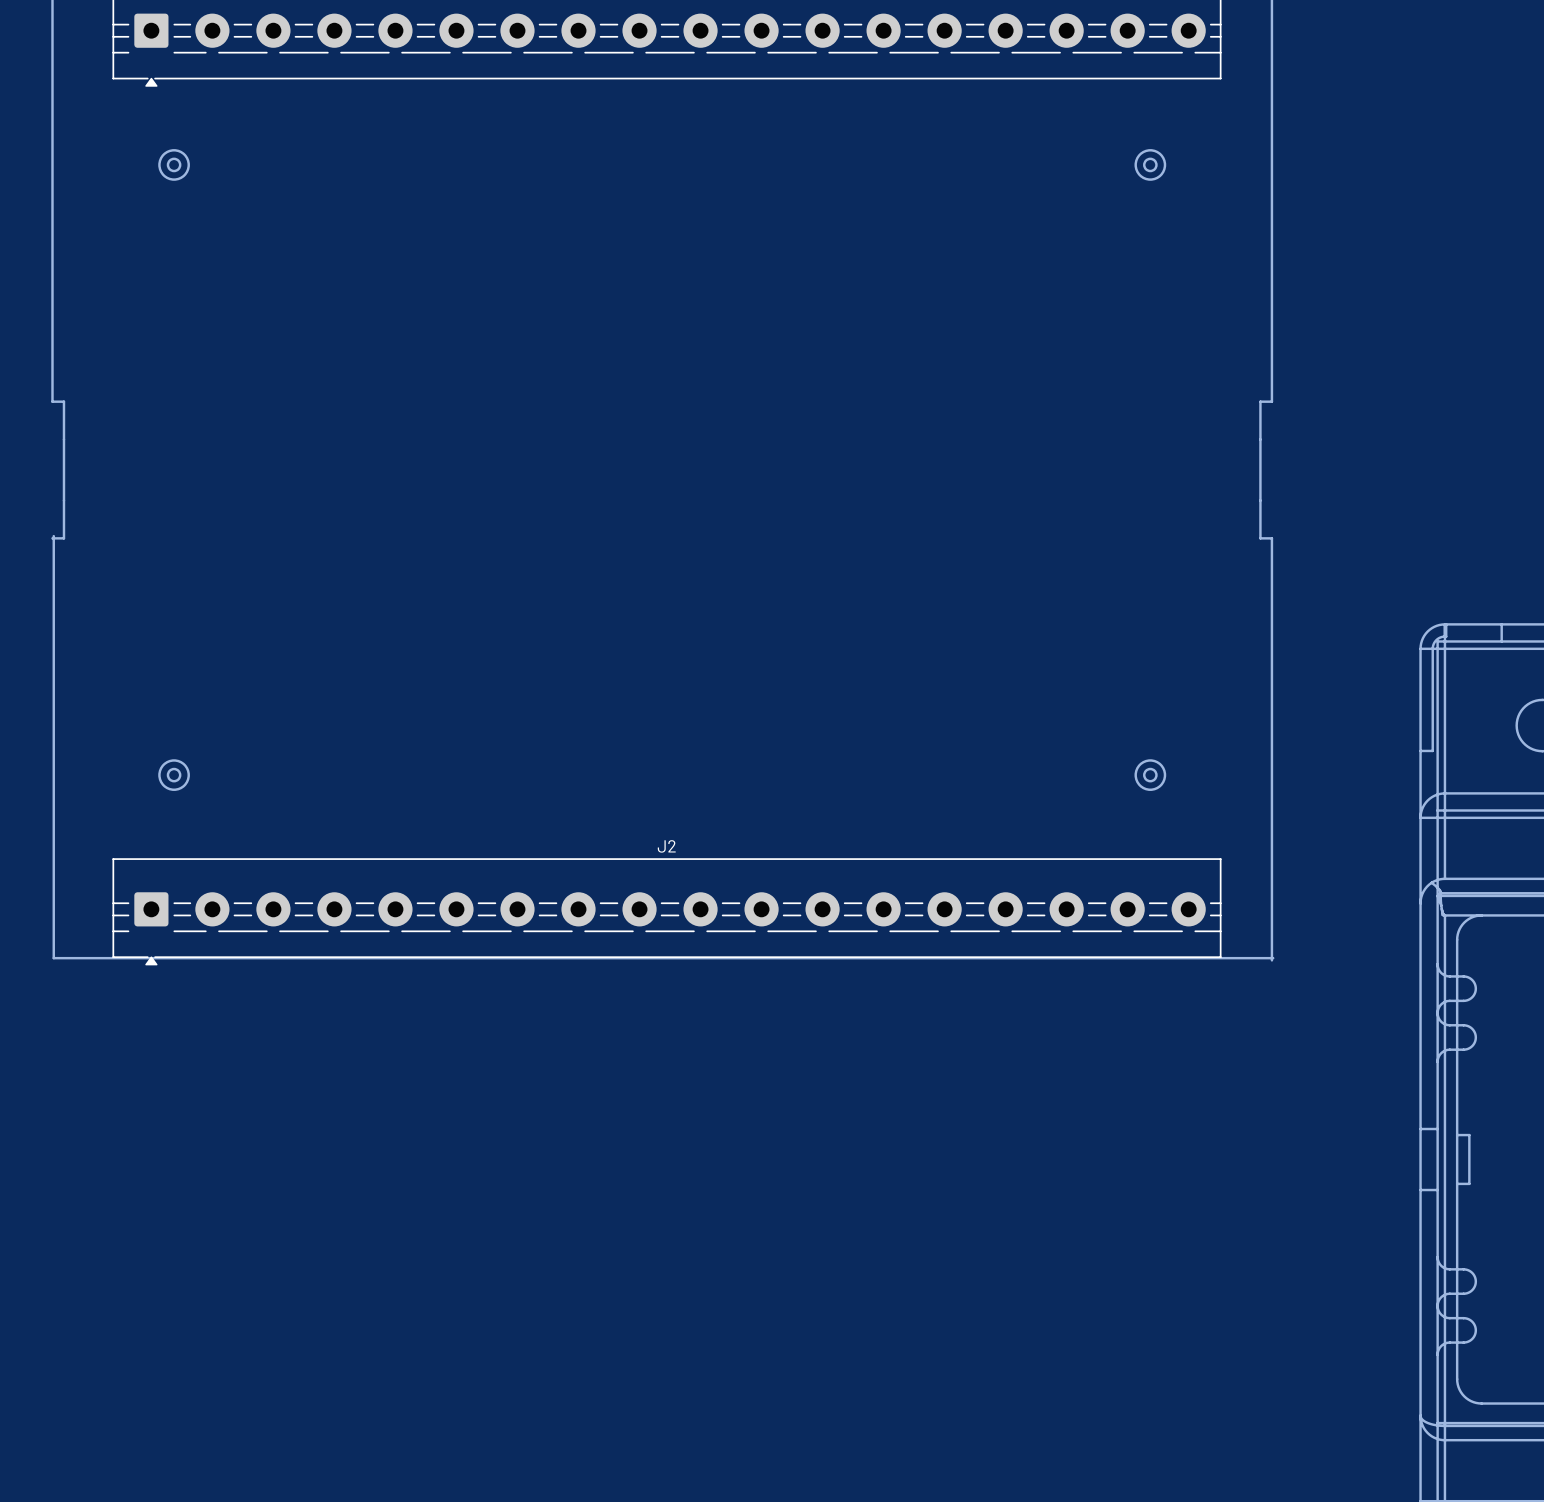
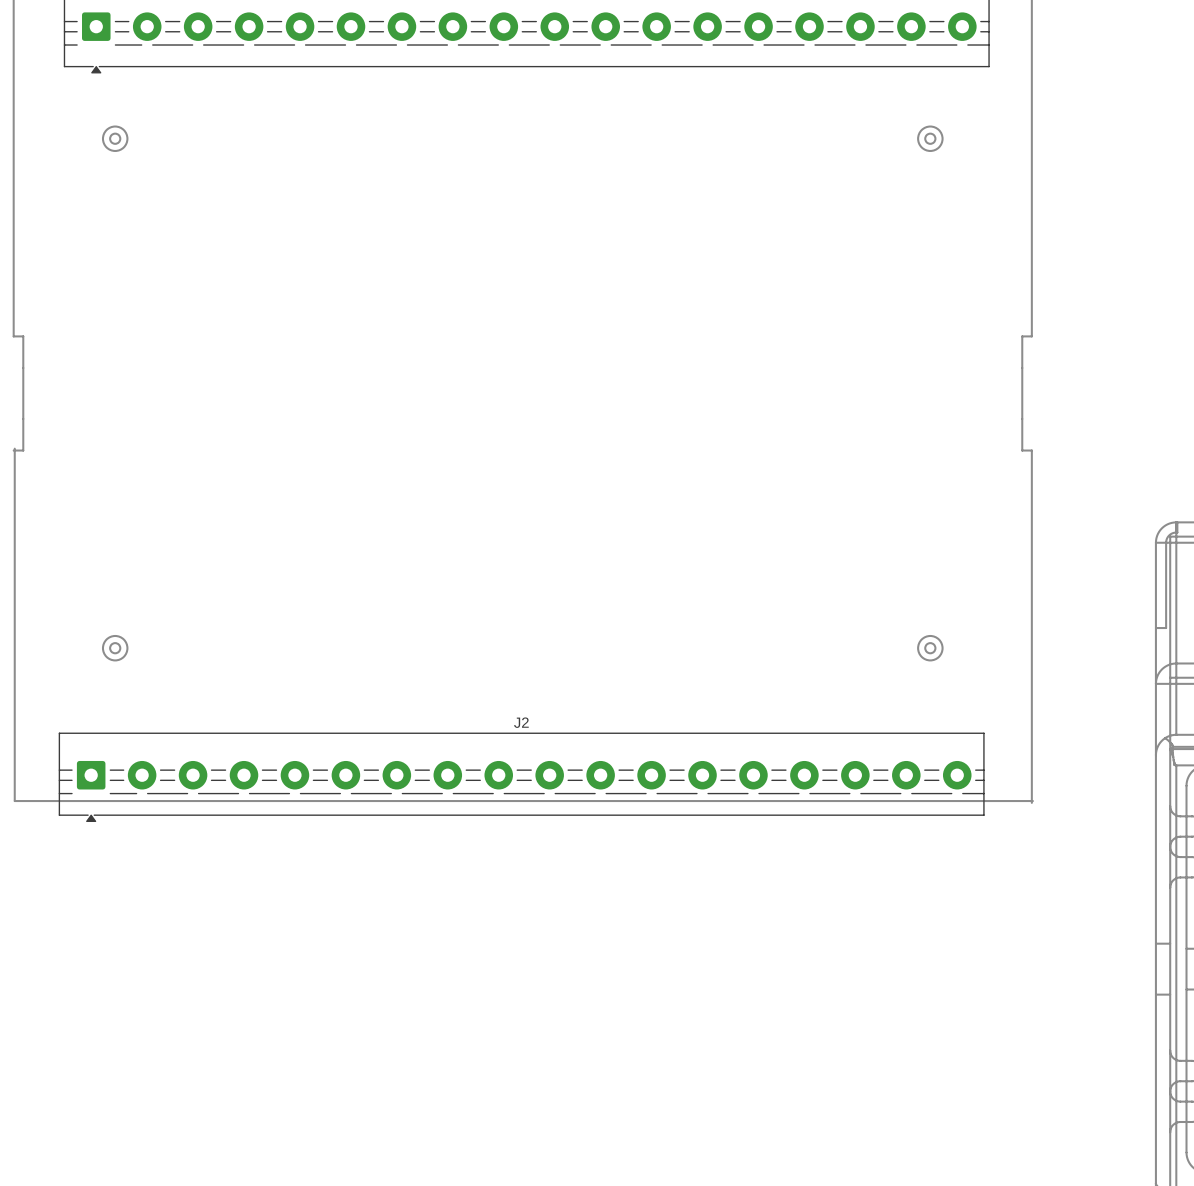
J2 position: (666, 911) -> (521, 777)

